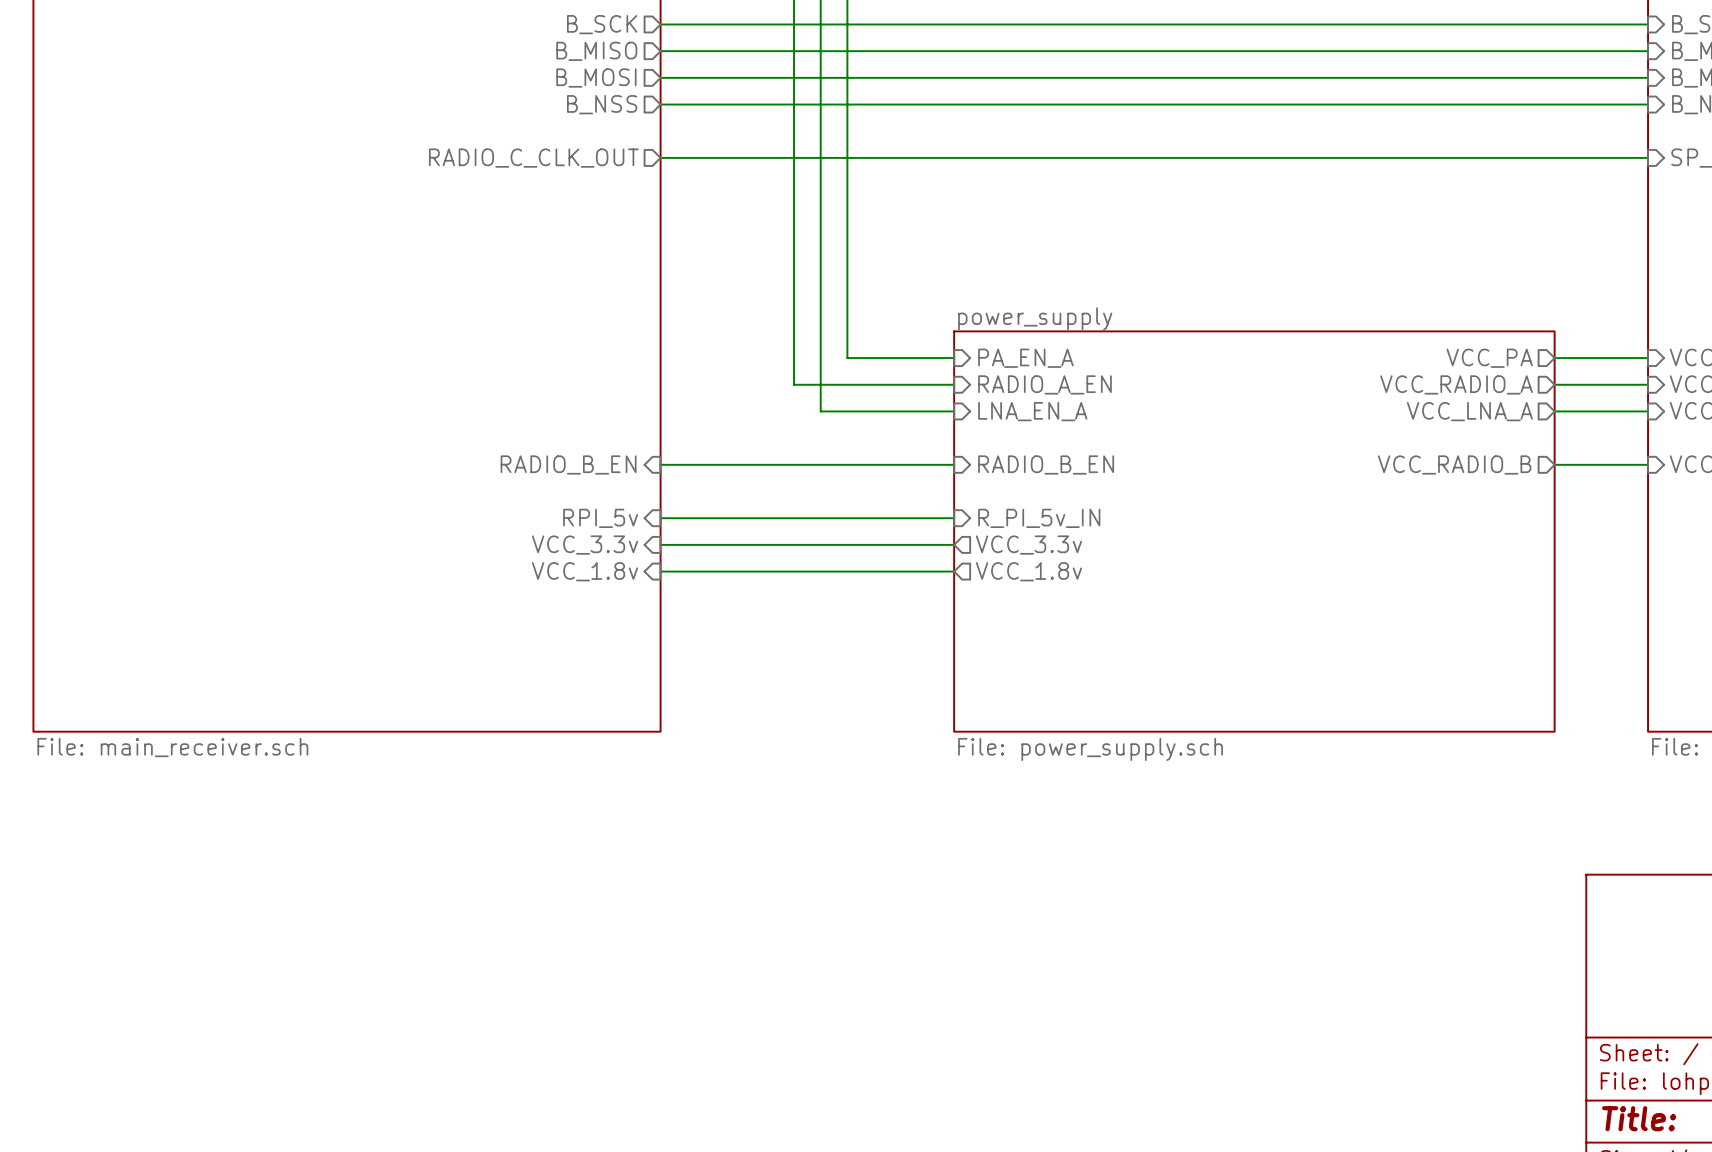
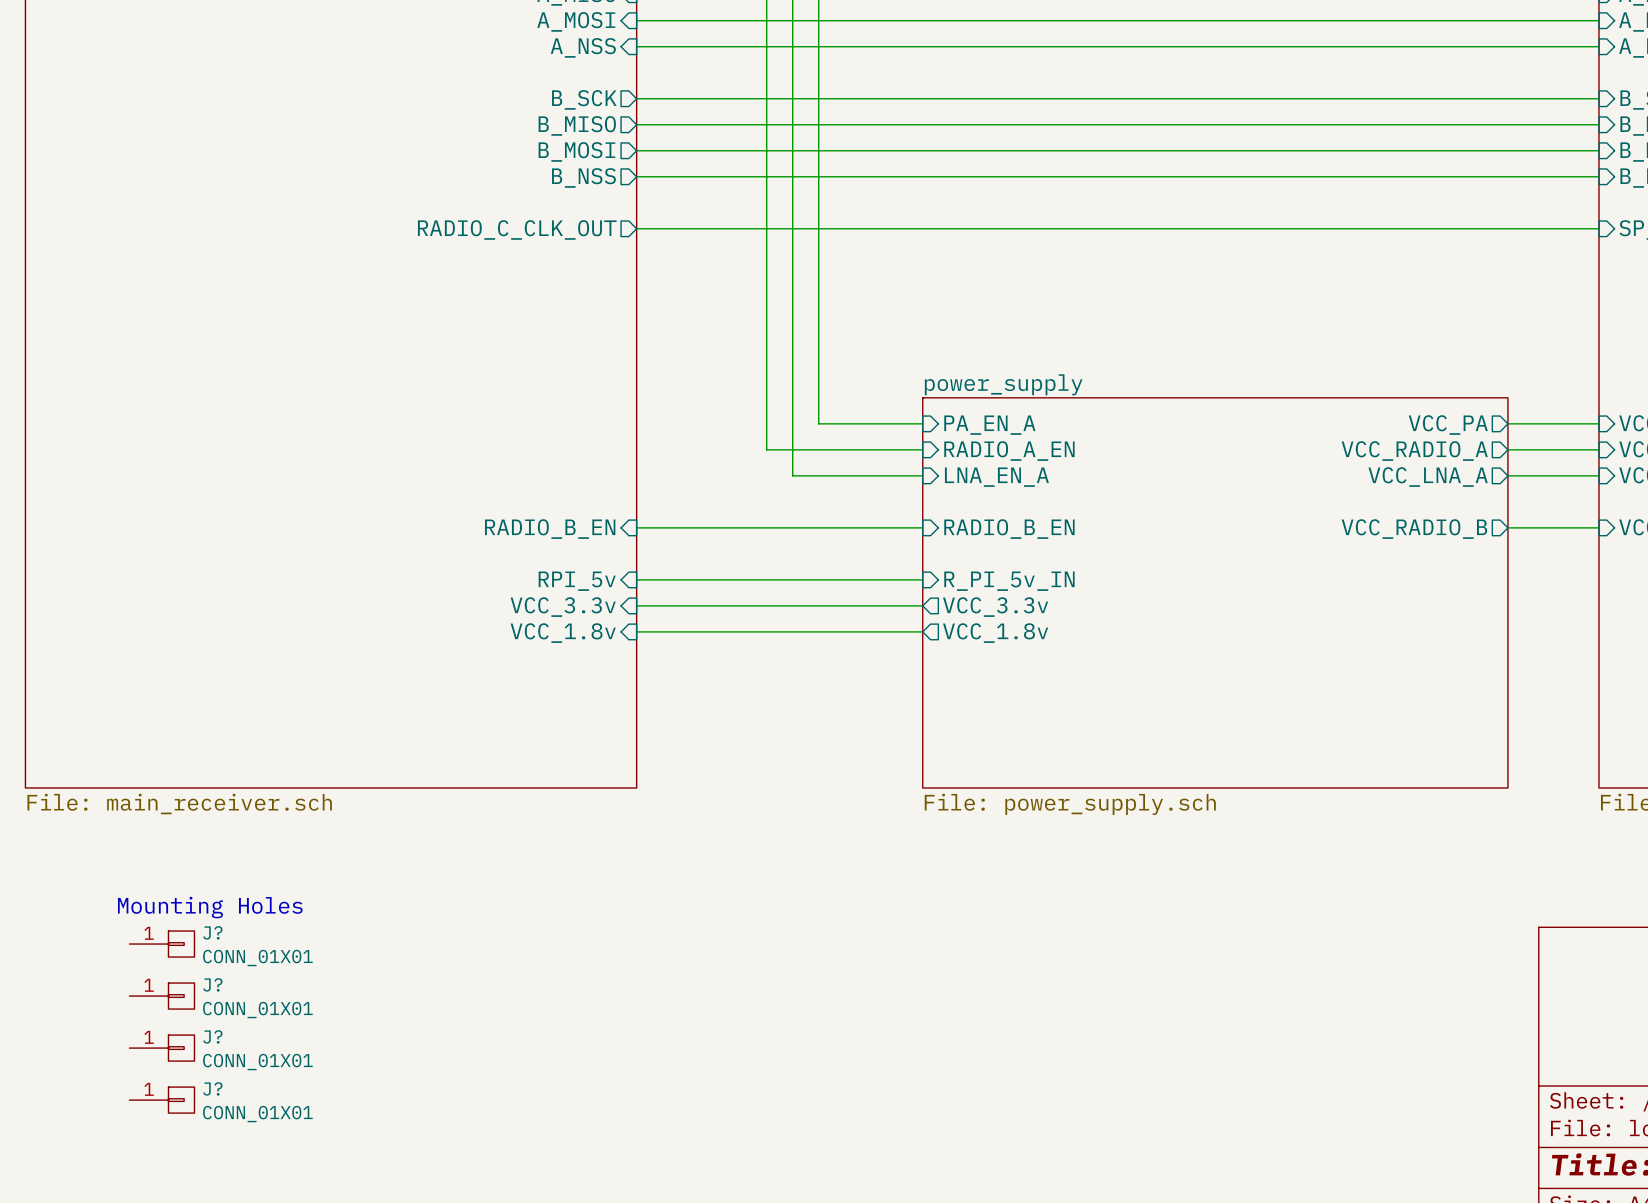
text: none -> Mounting Holes (210, 907)
J?: none -> CONN_01X01 (161, 944)
J?: none -> CONN_01X01 (161, 996)
J?: none -> CONN_01X01 (161, 1048)
J?: none -> CONN_01X01 (161, 1100)

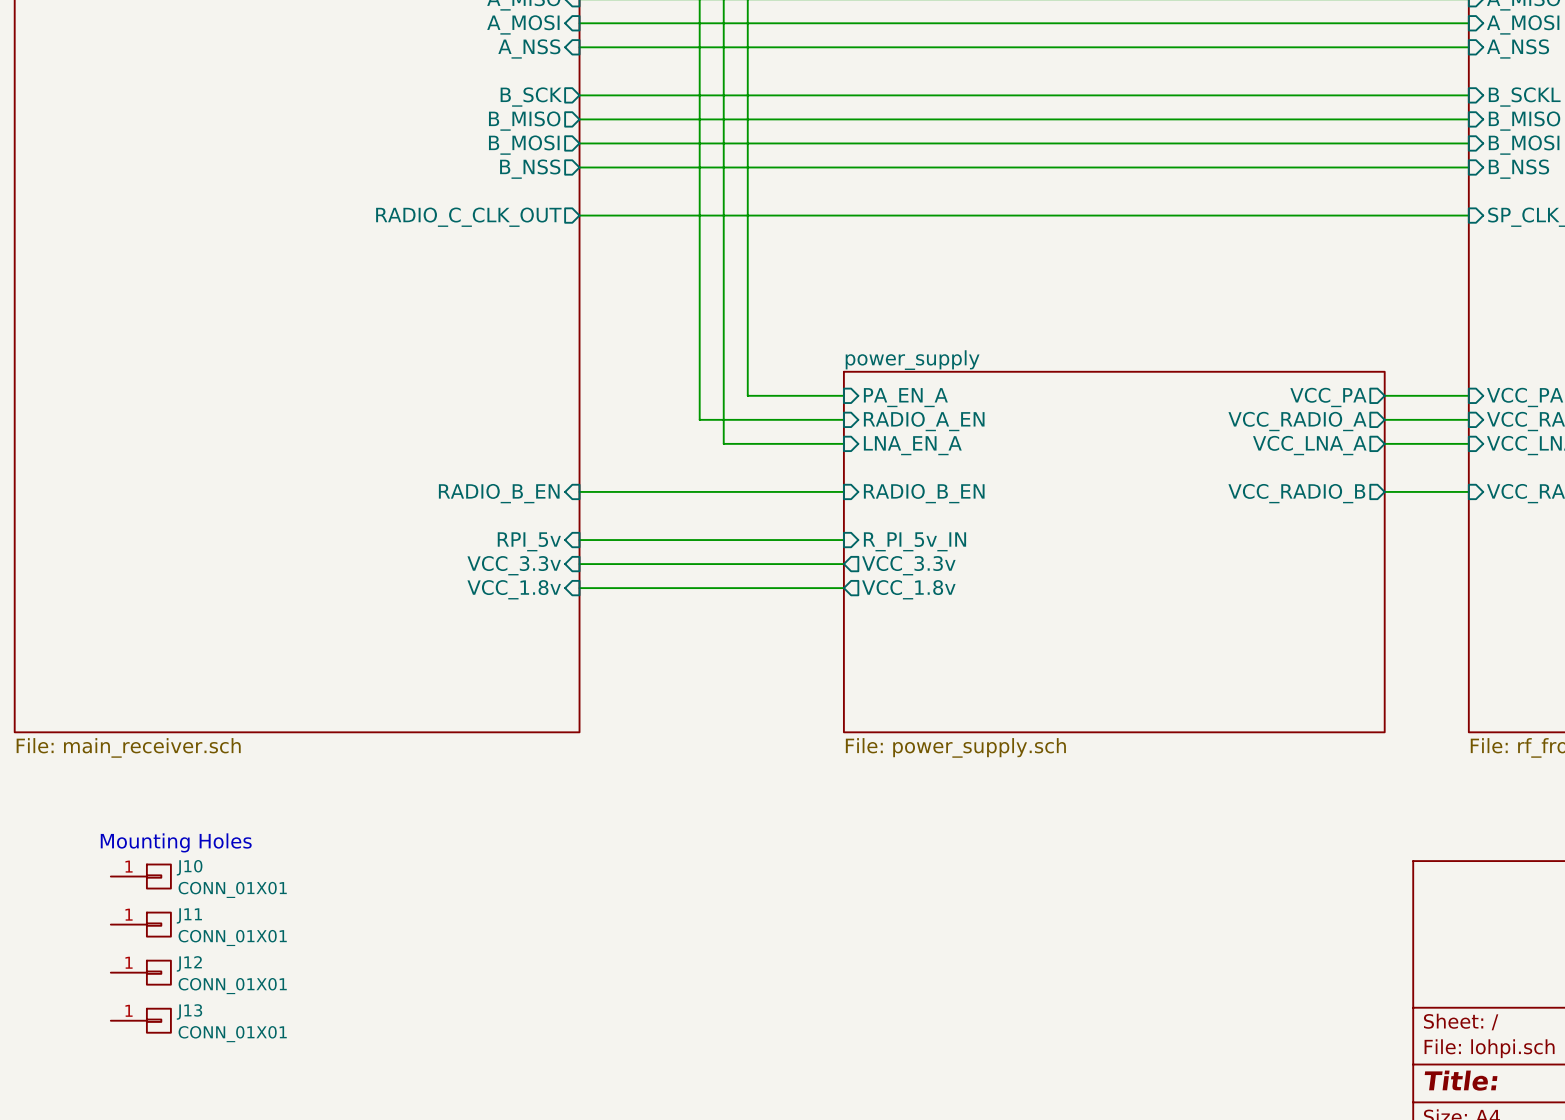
J? name: J? (212, 932) -> J10 (189, 867)
J? name: J? (212, 984) -> J11 (189, 915)
J? name: J? (212, 1036) -> J12 (189, 963)
J? name: J? (212, 1088) -> J13 (189, 1011)

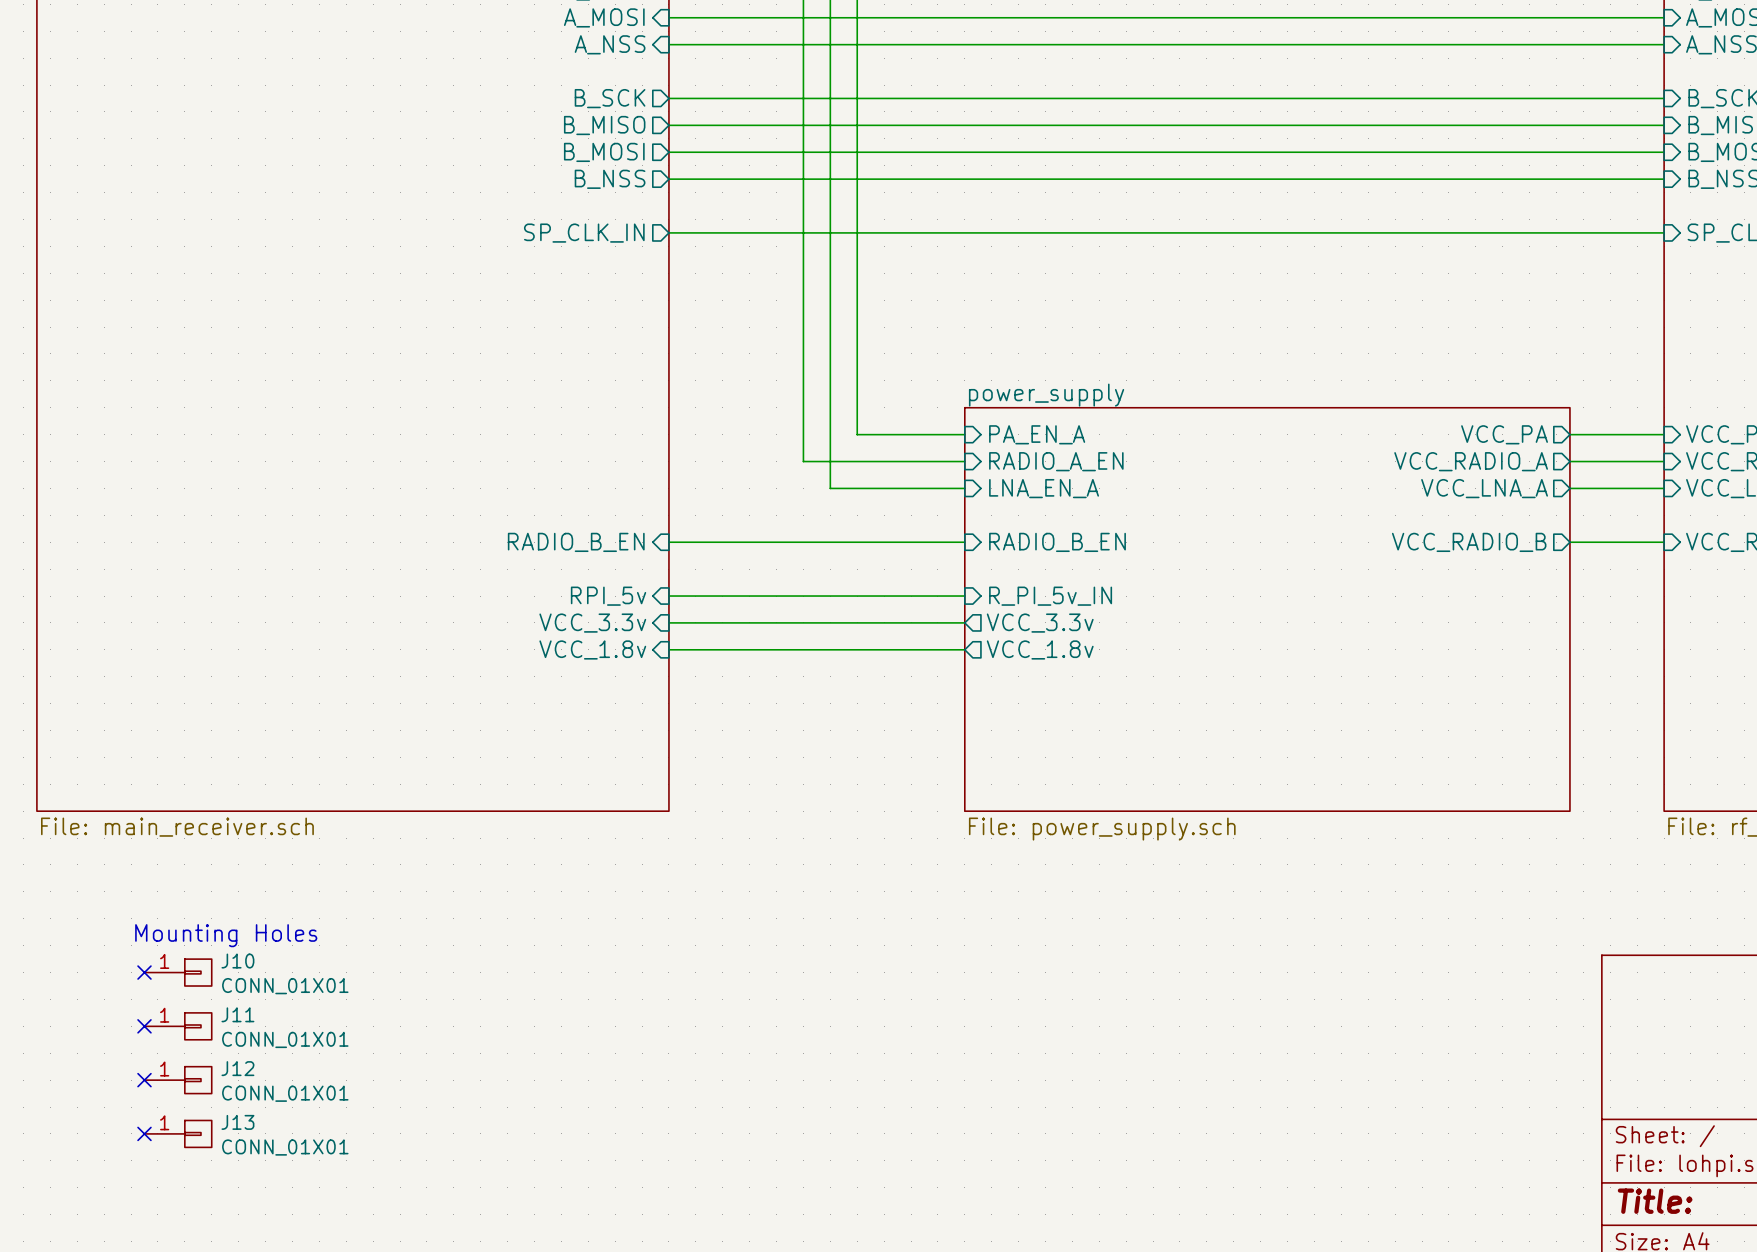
sheet pin: RADIO_C_CLK_OUT (468, 217) -> SP_CLK_IN (584, 233)
no-connect mark: none -> (144, 972)
no-connect mark: none -> (144, 1026)
no-connect mark: none -> (144, 1080)
no-connect mark: none -> (144, 1133)

